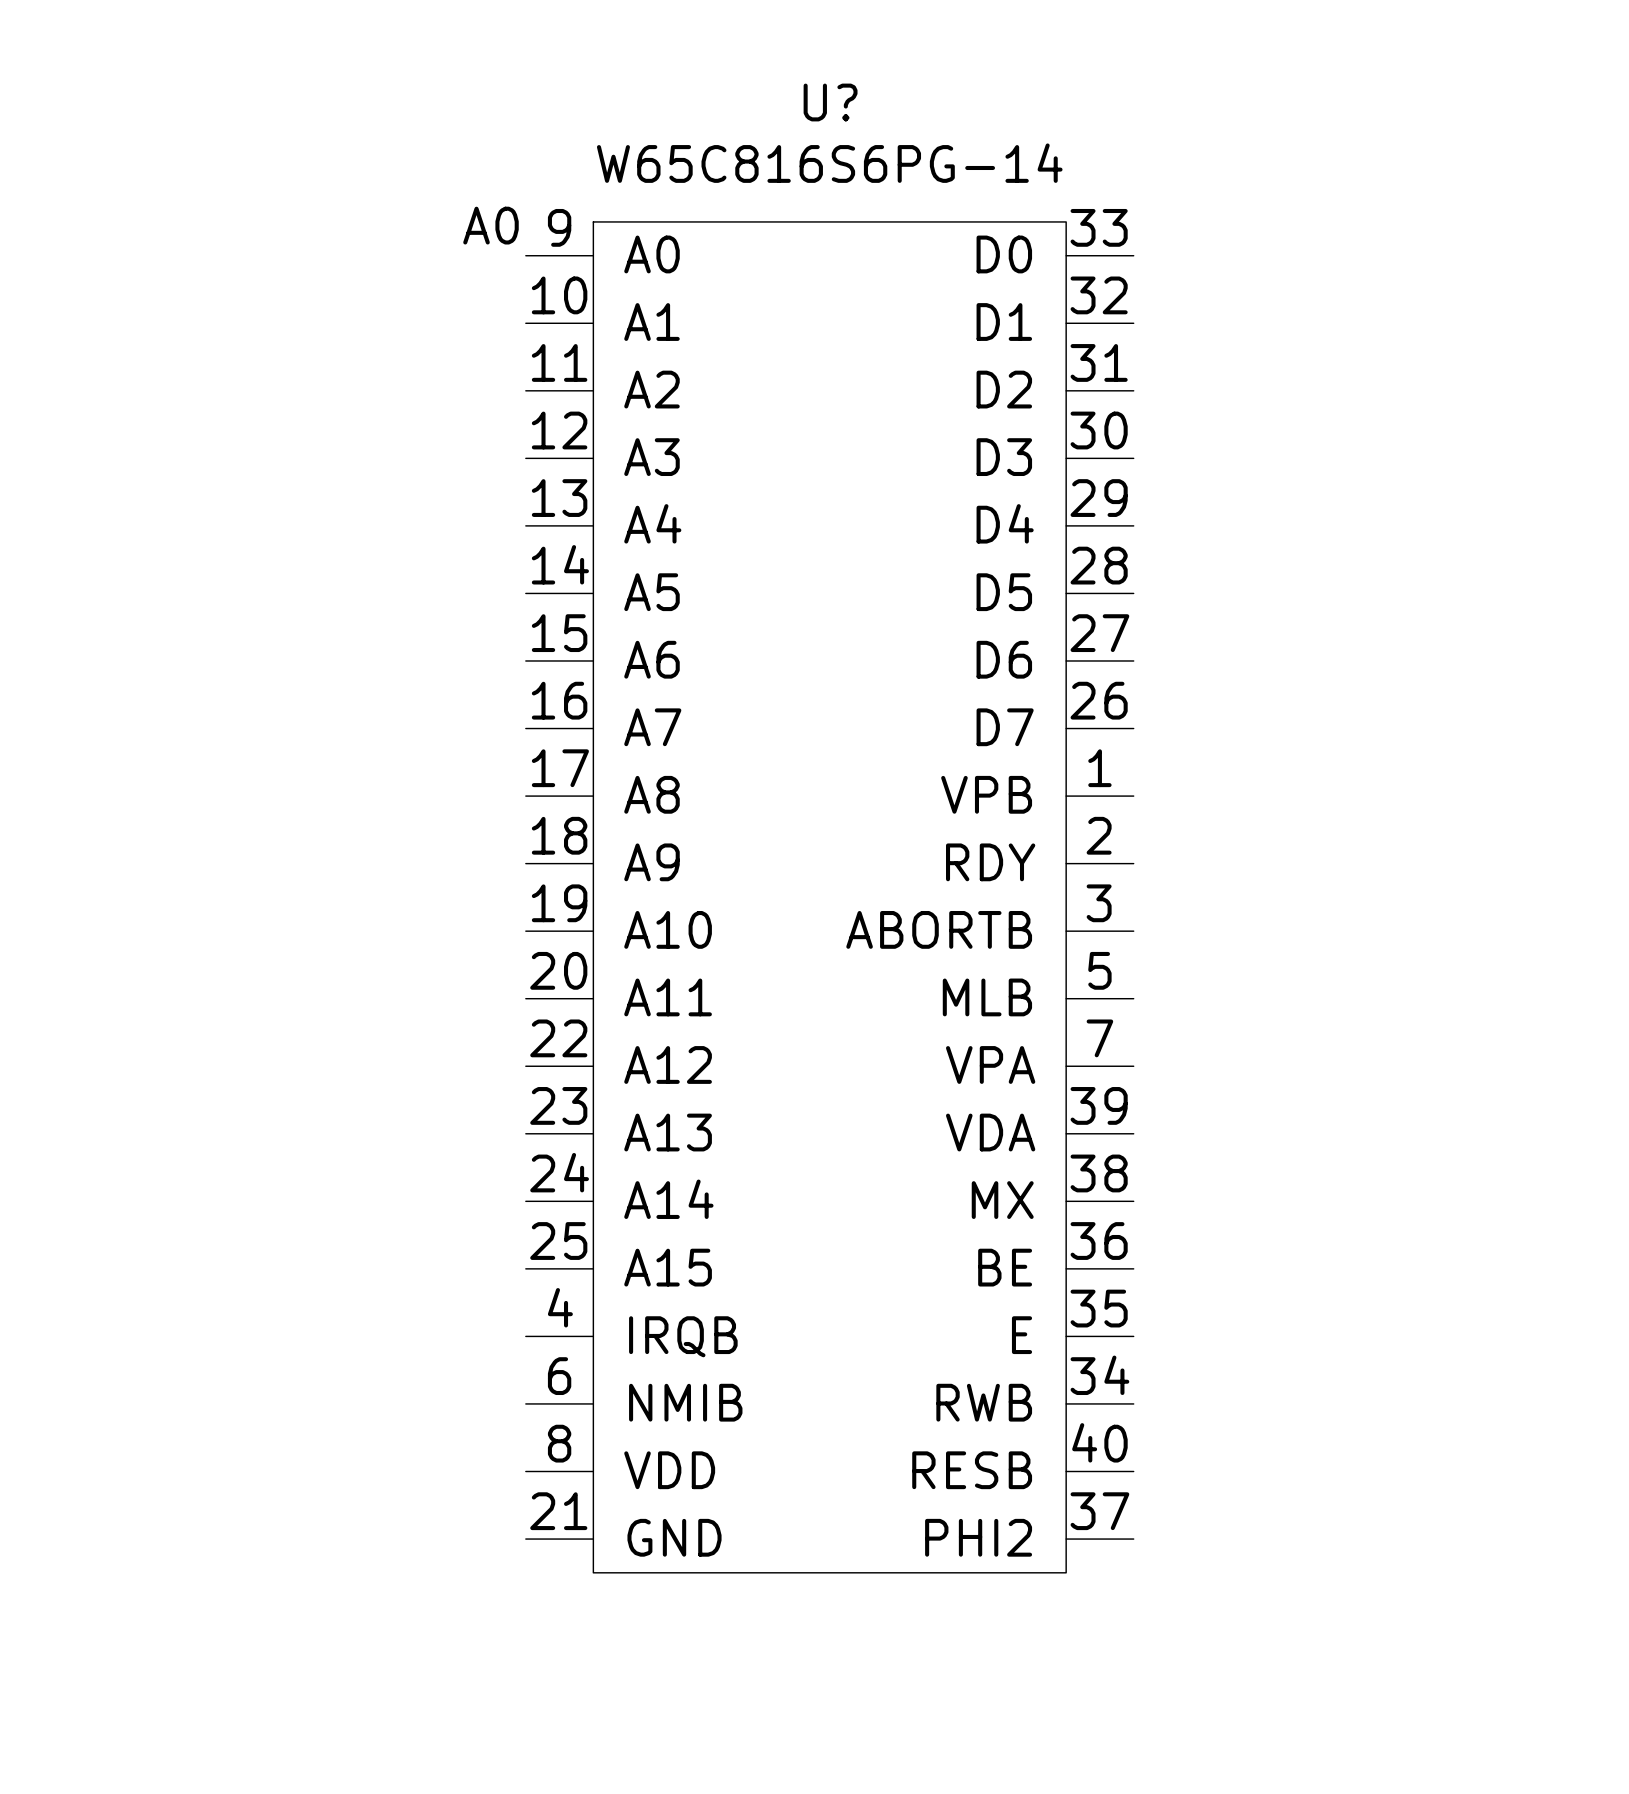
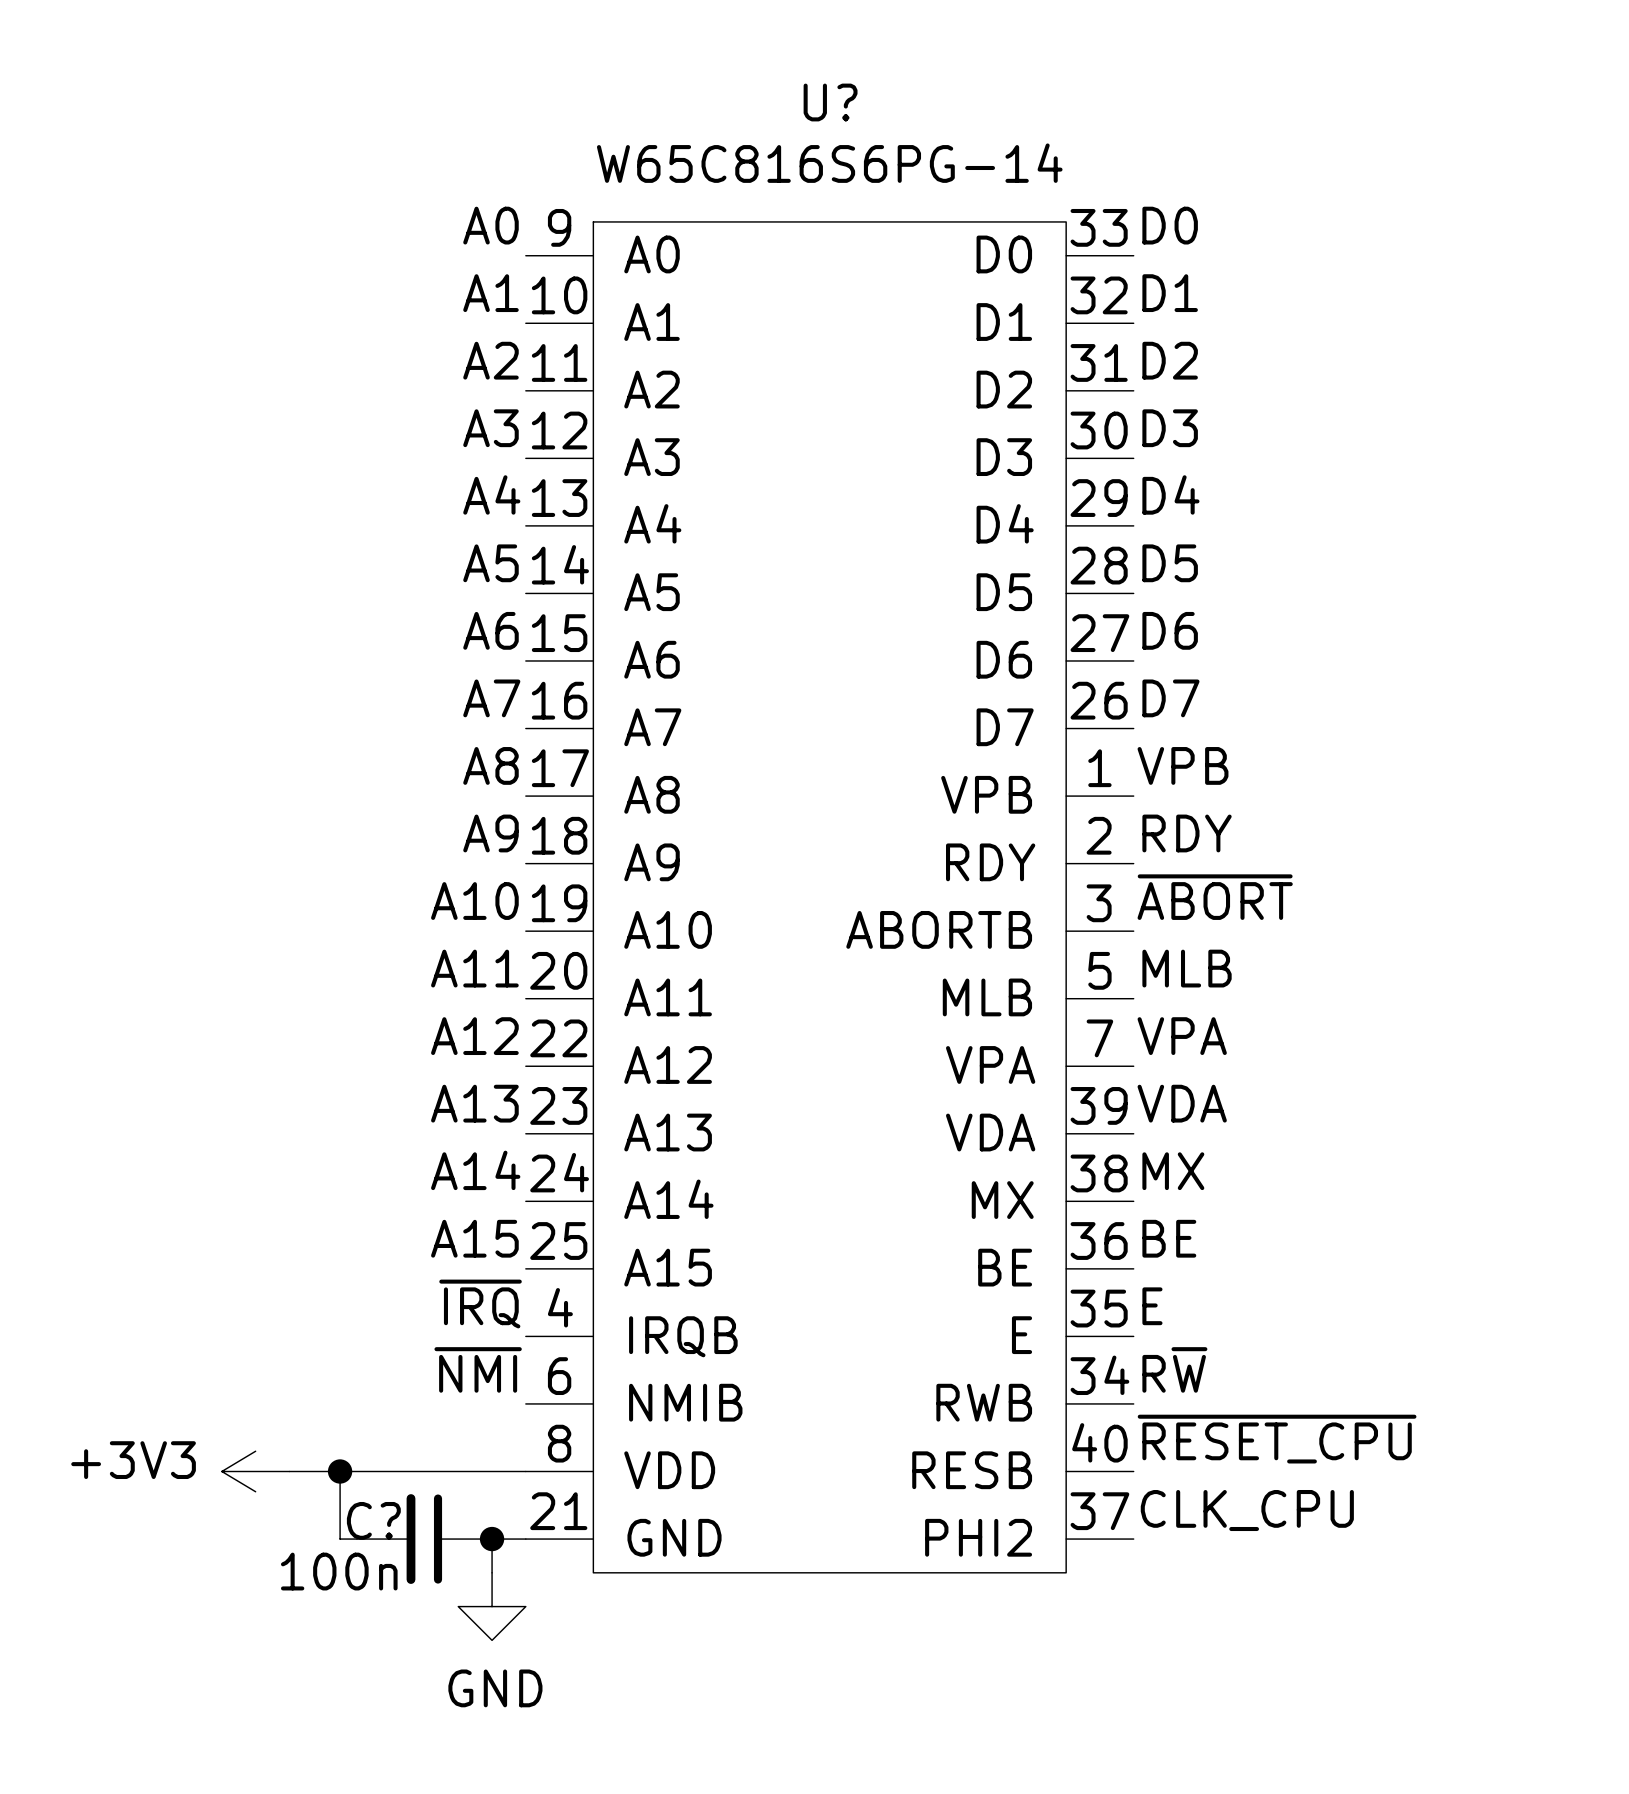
label: none -> D0 (1170, 225)
label: none -> A1 (490, 293)
label: none -> D1 (1170, 293)
label: none -> A2 (490, 360)
label: none -> D2 (1170, 360)
label: none -> A3 (490, 428)
label: none -> D3 (1170, 428)
label: none -> A4 (491, 494)
label: none -> D4 (1170, 494)
label: none -> A5 (490, 563)
label: none -> D5 (1170, 563)
label: none -> A6 (490, 630)
label: none -> D6 (1170, 630)
label: none -> A7 (491, 698)
label: none -> D7 (1170, 698)
label: none -> A8 (490, 765)
label: none -> VPB (1183, 765)
label: none -> A9 (490, 833)
label: none -> RDY (1187, 833)
label: none -> ~{ABORT} (1215, 897)
label: none -> A10 (474, 901)
label: none -> A11 (474, 968)
label: none -> MLB (1187, 968)
label: none -> A12 (474, 1036)
label: none -> VPA (1182, 1036)
label: none -> A13 (474, 1103)
label: none -> VDA (1182, 1103)
label: none -> A14 (475, 1170)
label: none -> MX (1173, 1171)
label: none -> A15 (474, 1238)
label: none -> BE (1169, 1238)
label: none -> ~{IRQ} (480, 1304)
label: none -> E (1152, 1306)
label: none -> ~{NMI} (478, 1369)
label: none -> R~{W} (1174, 1369)
label: none -> ~{RESET_CPU} (1277, 1439)
power symbol: none -> +3V3 (255, 1471)
wire: none -> (289, 1471) (525, 1471)
wire: none -> (340, 1471) (340, 1539) (356, 1539)
junction: none -> (340, 1471)
label: none -> CLK_CPU (1247, 1510)
C?: none -> 100n (424, 1539)
junction: none -> (492, 1539)
wire: none -> (525, 1539) (492, 1539) (492, 1572)
power symbol: none -> GND (492, 1606)

